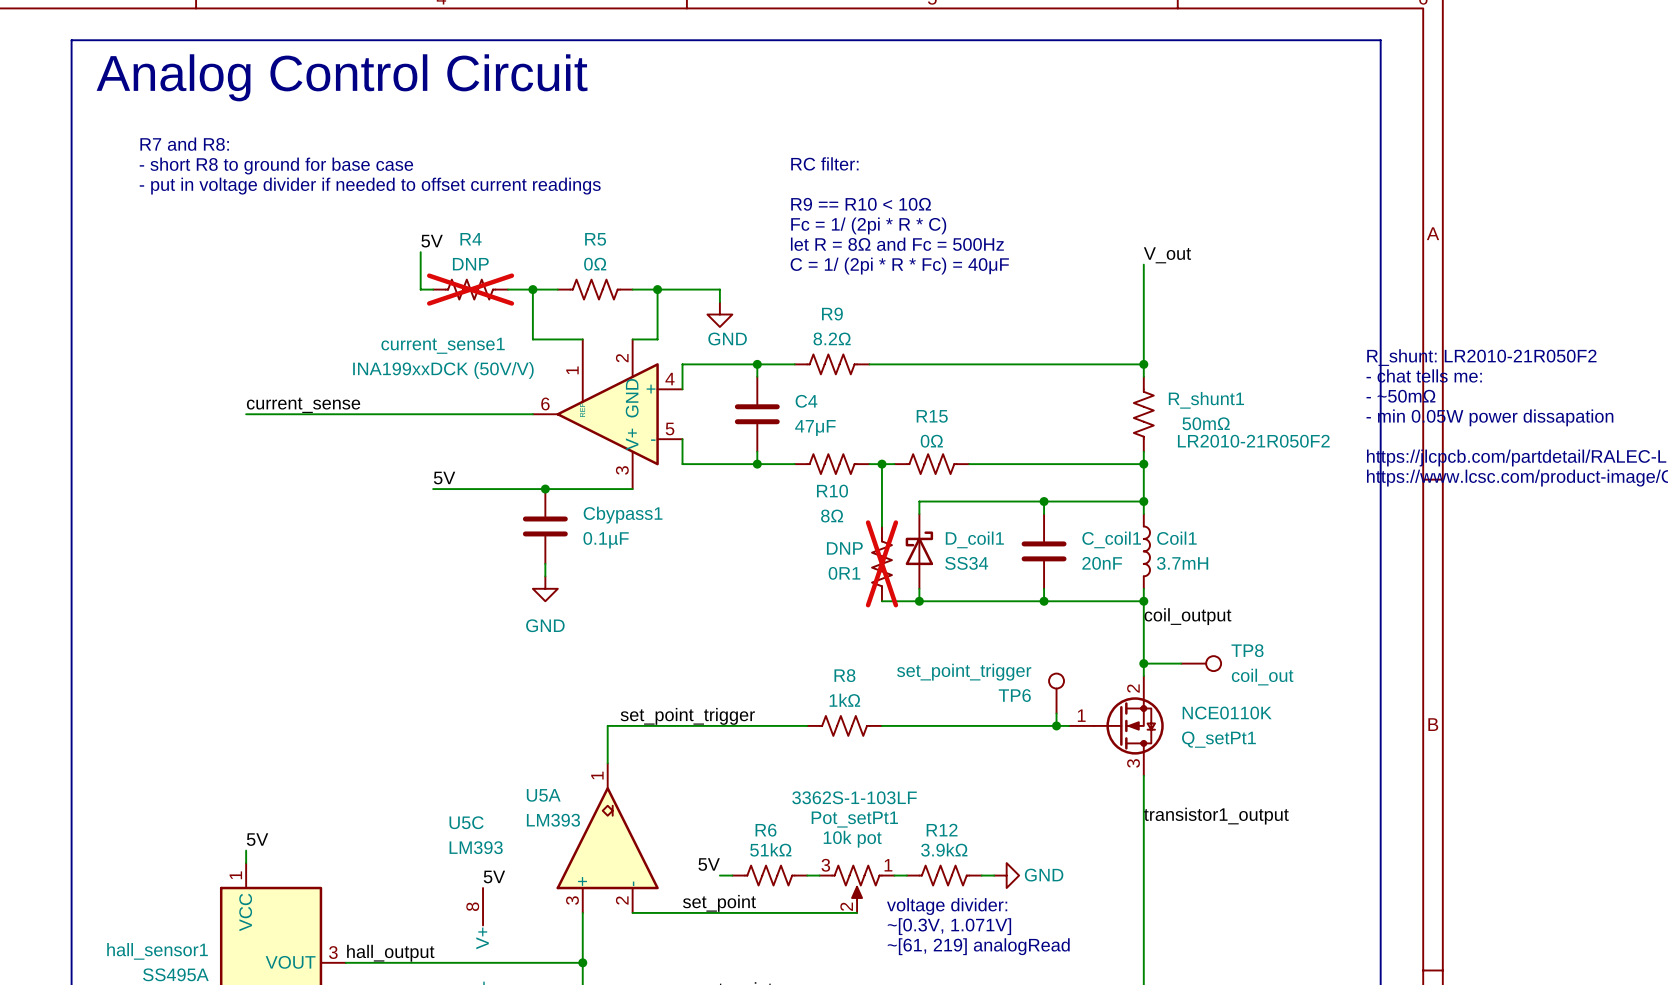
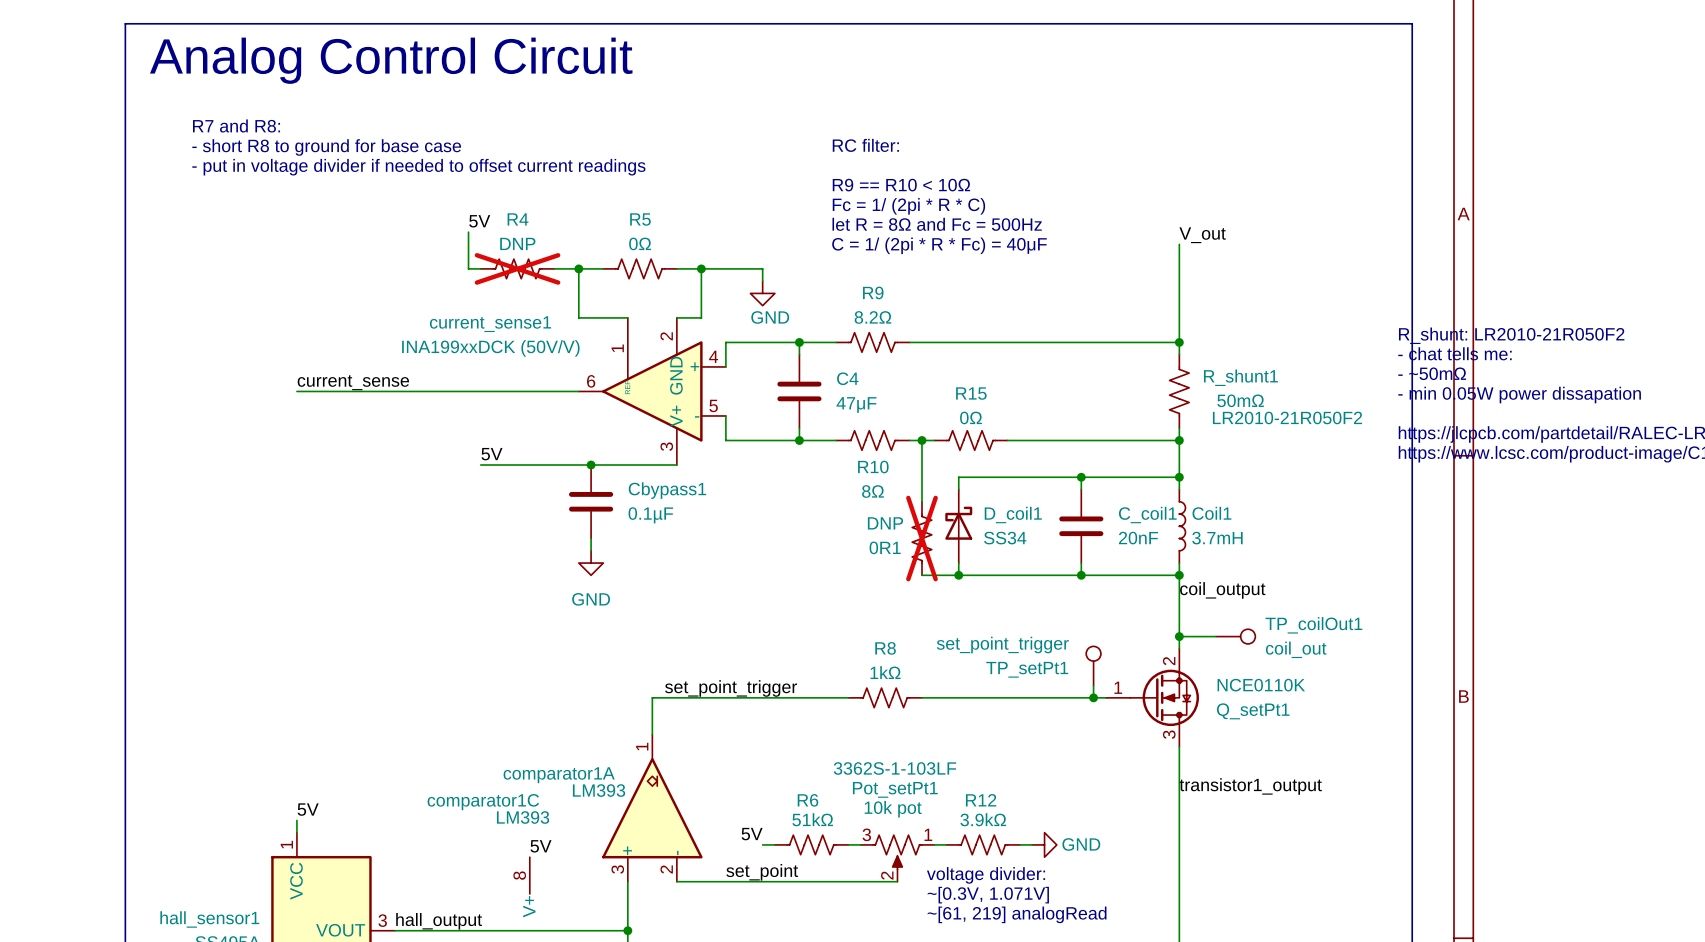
TP8 name: TP8 (1247, 650) -> TP_coilOut1 (1313, 625)
TP6 name: TP6 (1014, 695) -> TP_setPt1 (1027, 669)
U5A name: U5A (543, 795) -> comparator1A (559, 775)
U5C name: U5C (466, 822) -> comparator1C (483, 802)

